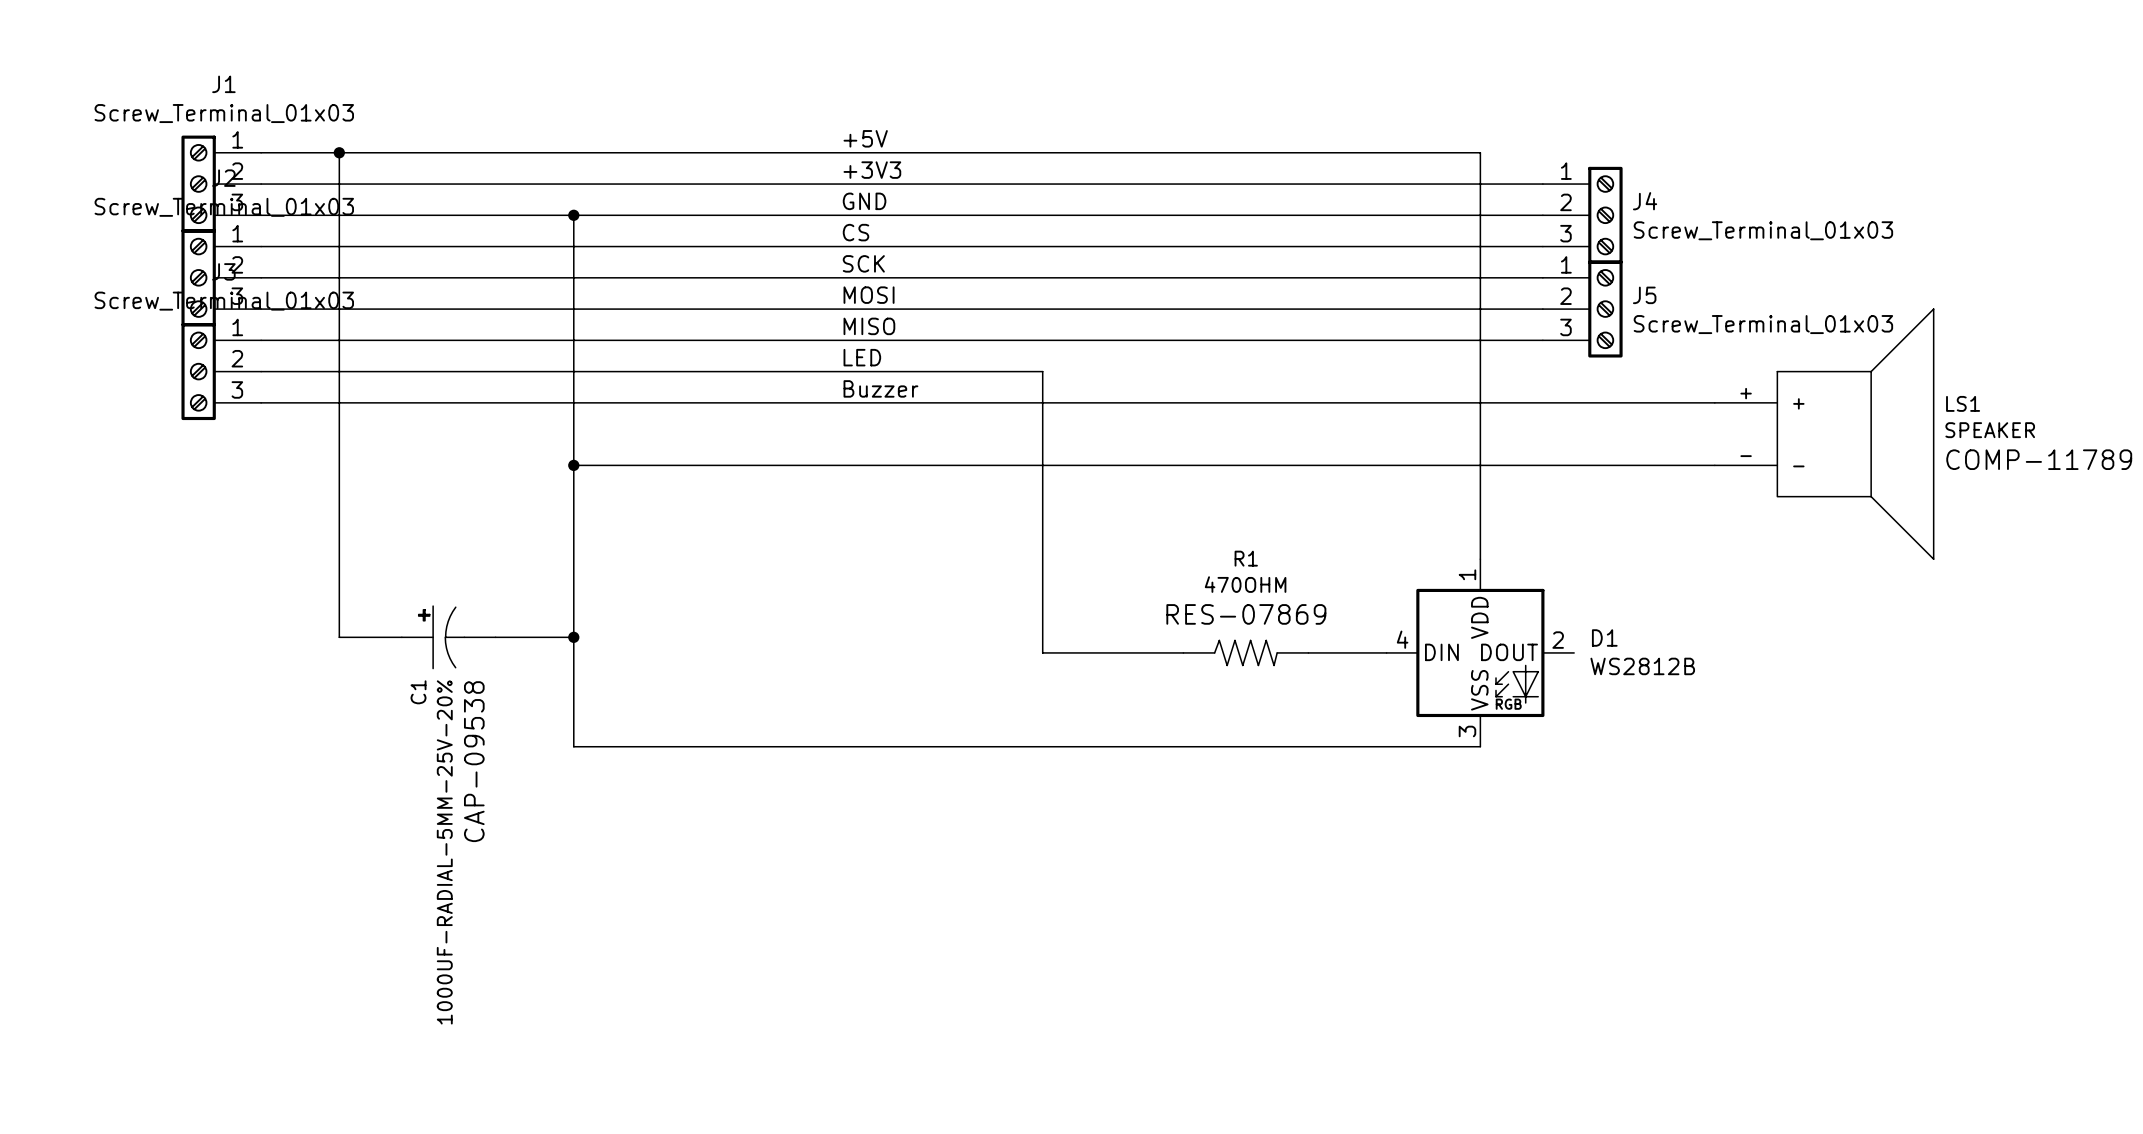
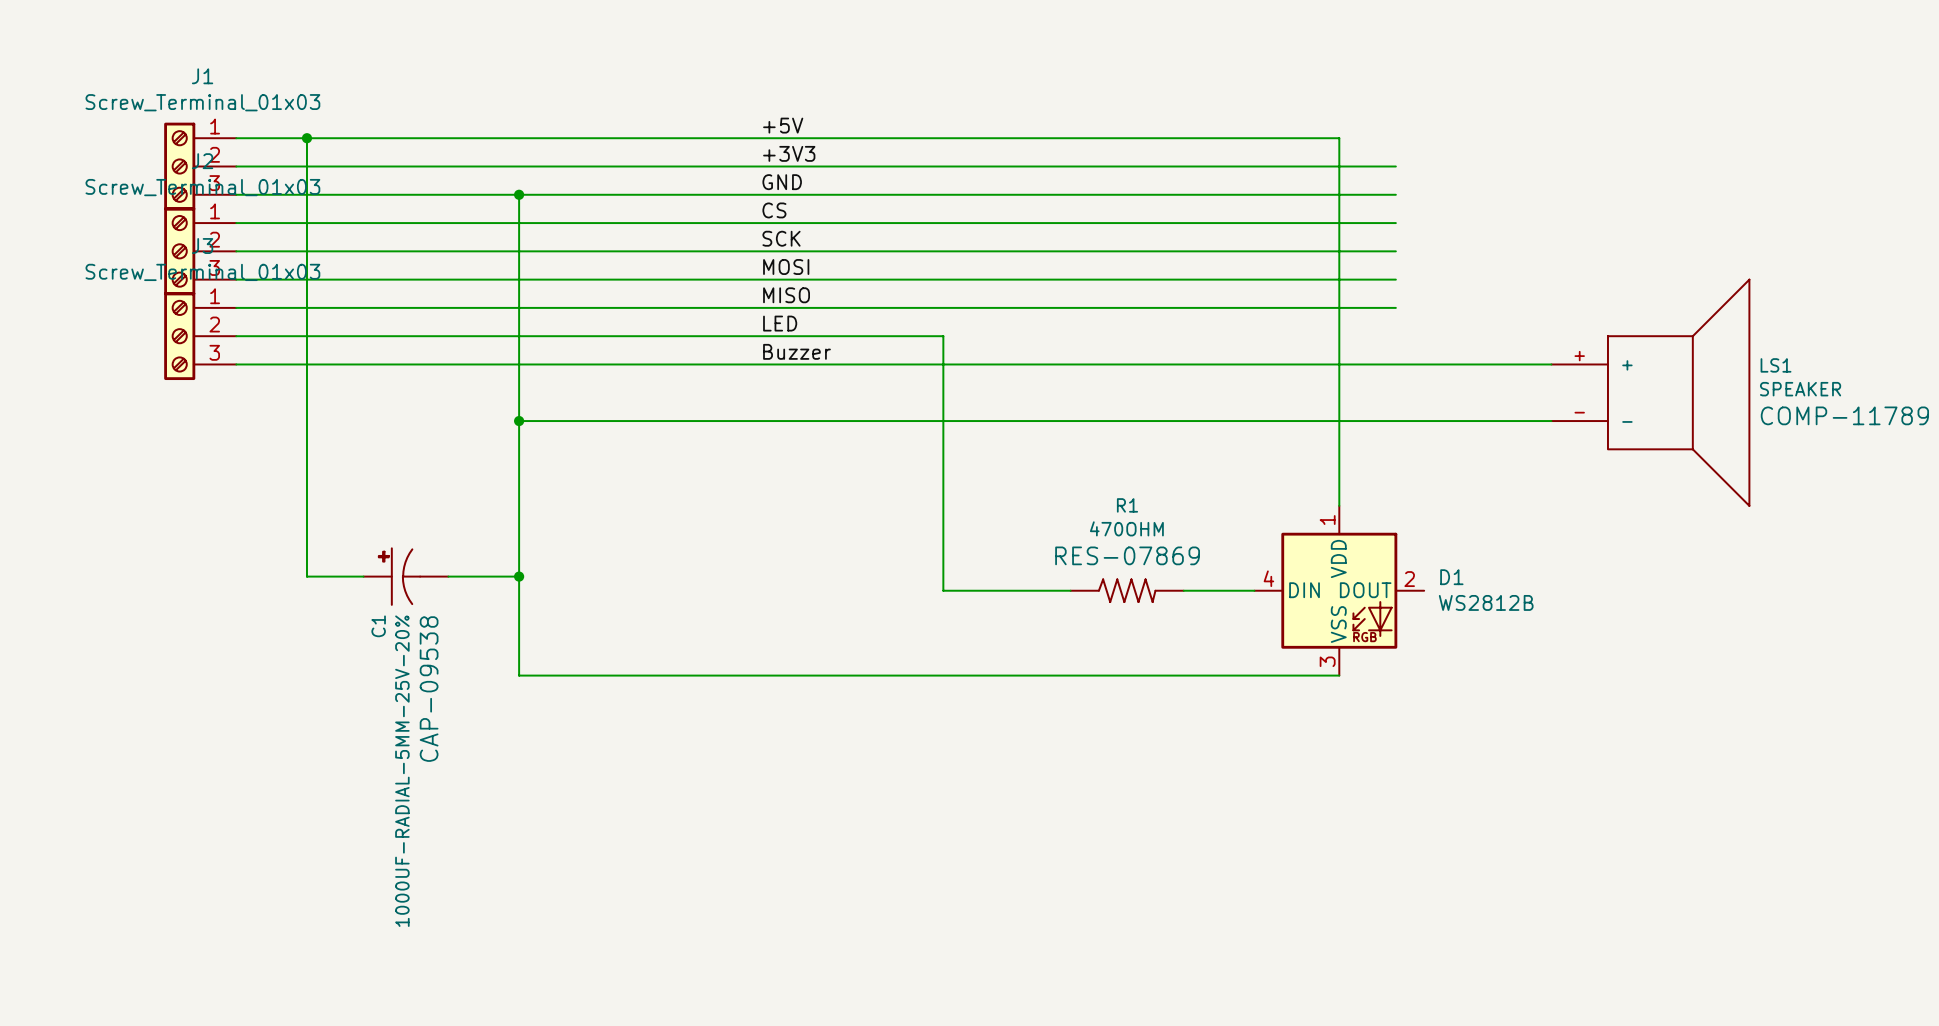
J4: Screw_Terminal_01x03 (1582, 215) -> none
J5: Screw_Terminal_01x03 (1582, 309) -> none

